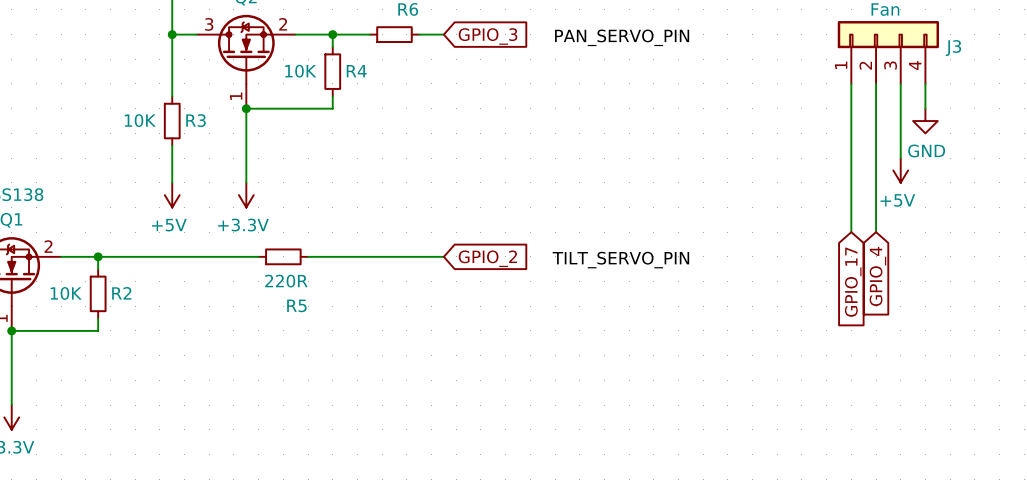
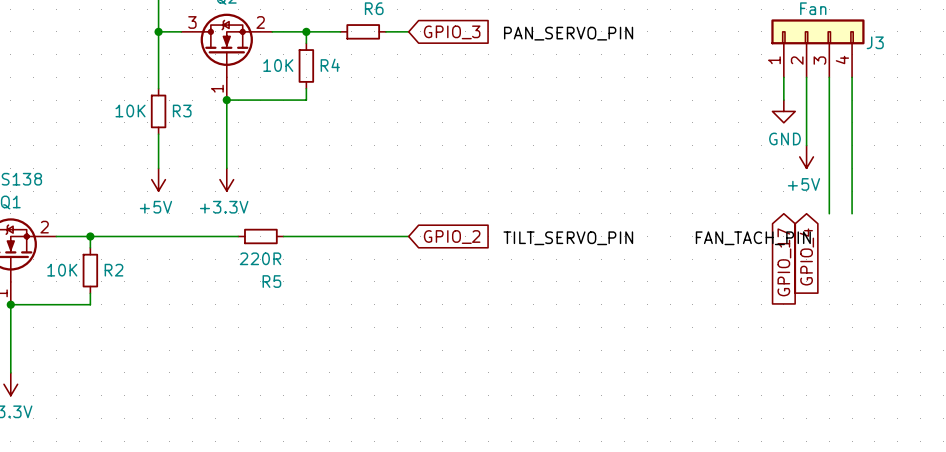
wire: (851, 108) (851, 232) -> (852, 100) (852, 213)
power symbol position: GND (925, 121) -> GND (783, 111)
wire: (876, 158) (876, 232) -> (829, 145) (829, 213)
power symbol position: +5V (900, 170) -> +5V (806, 156)
label: none -> FAN_TACH_PIN (753, 238)

